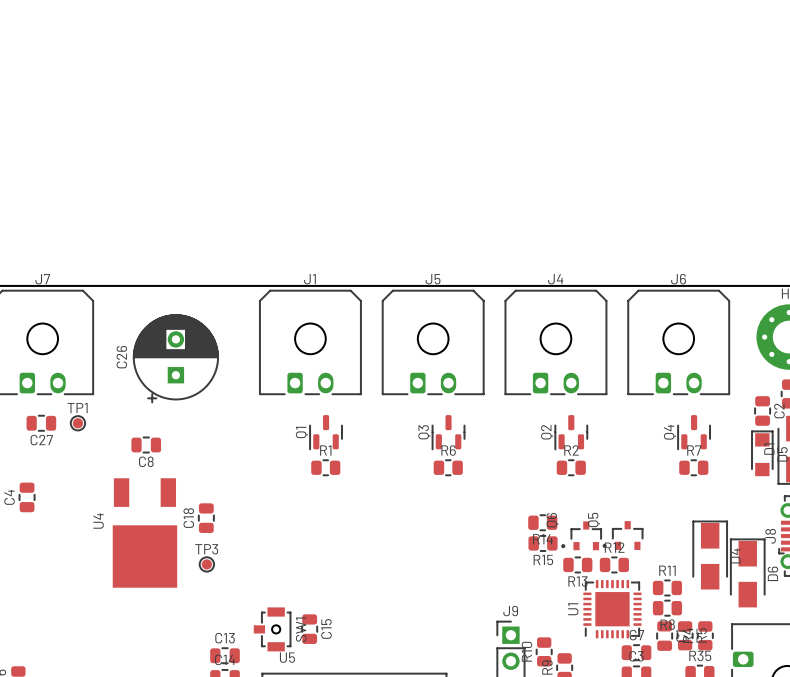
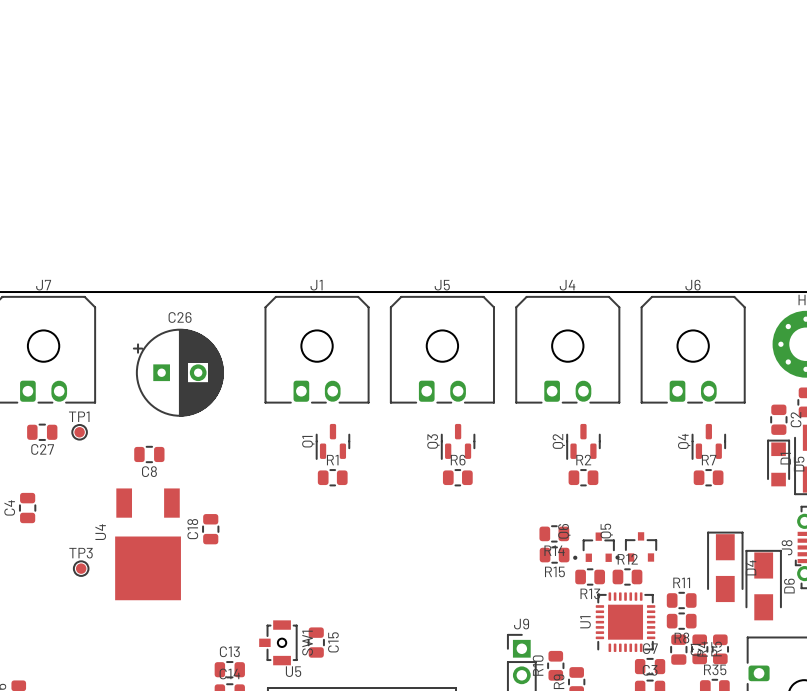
C26 rotation: 0° (175, 358) -> 90° clockwise (178, 372)
TP3 position: (206, 564) -> (81, 568)

